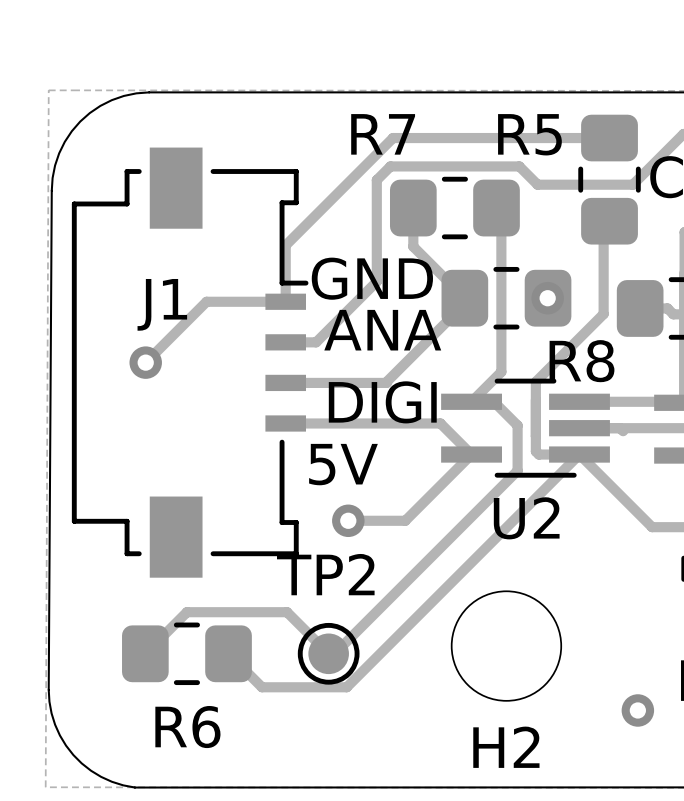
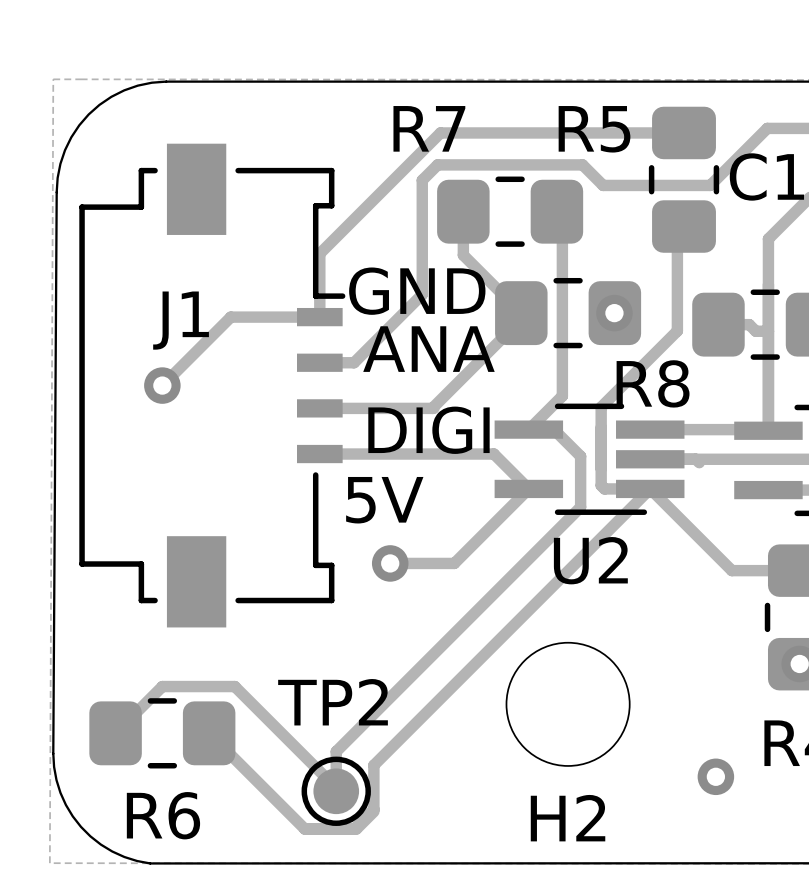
track: (145, 653) (186, 612) (287, 612) (328, 653) (334, 653) -> (336, 791) (336, 751) (374, 713)
R6 position: (186, 653) -> (162, 733)
track: (228, 653) (262, 687) (346, 687) -> (354, 828) (373, 809) (373, 765) (388, 750)
TP2 position: (328, 653) -> (336, 791)
track: none -> (115, 733) (162, 686) (234, 686) (336, 787)
track: none -> (209, 733) (304, 828) (356, 828) (373, 811)

